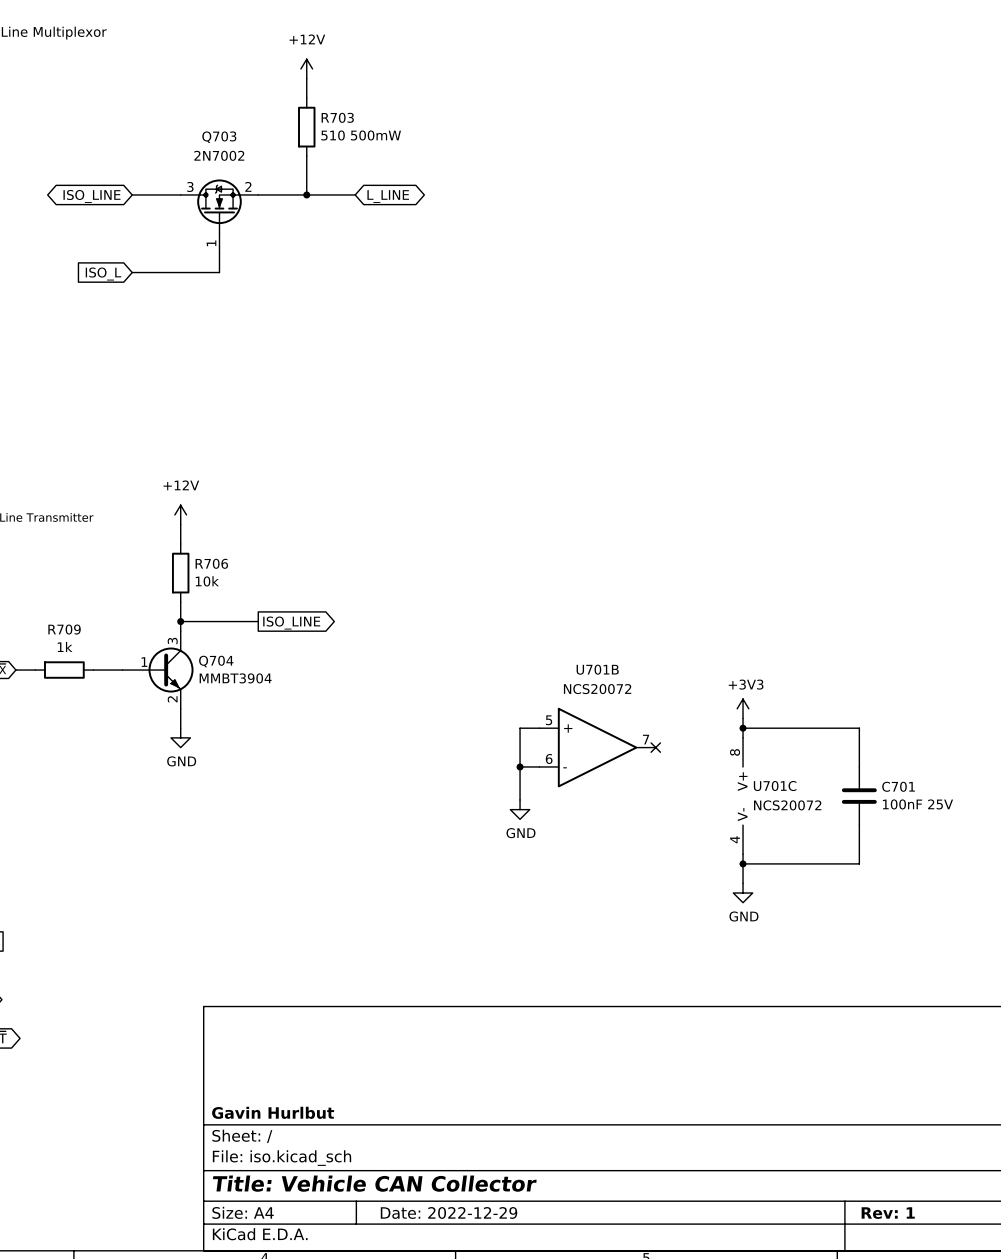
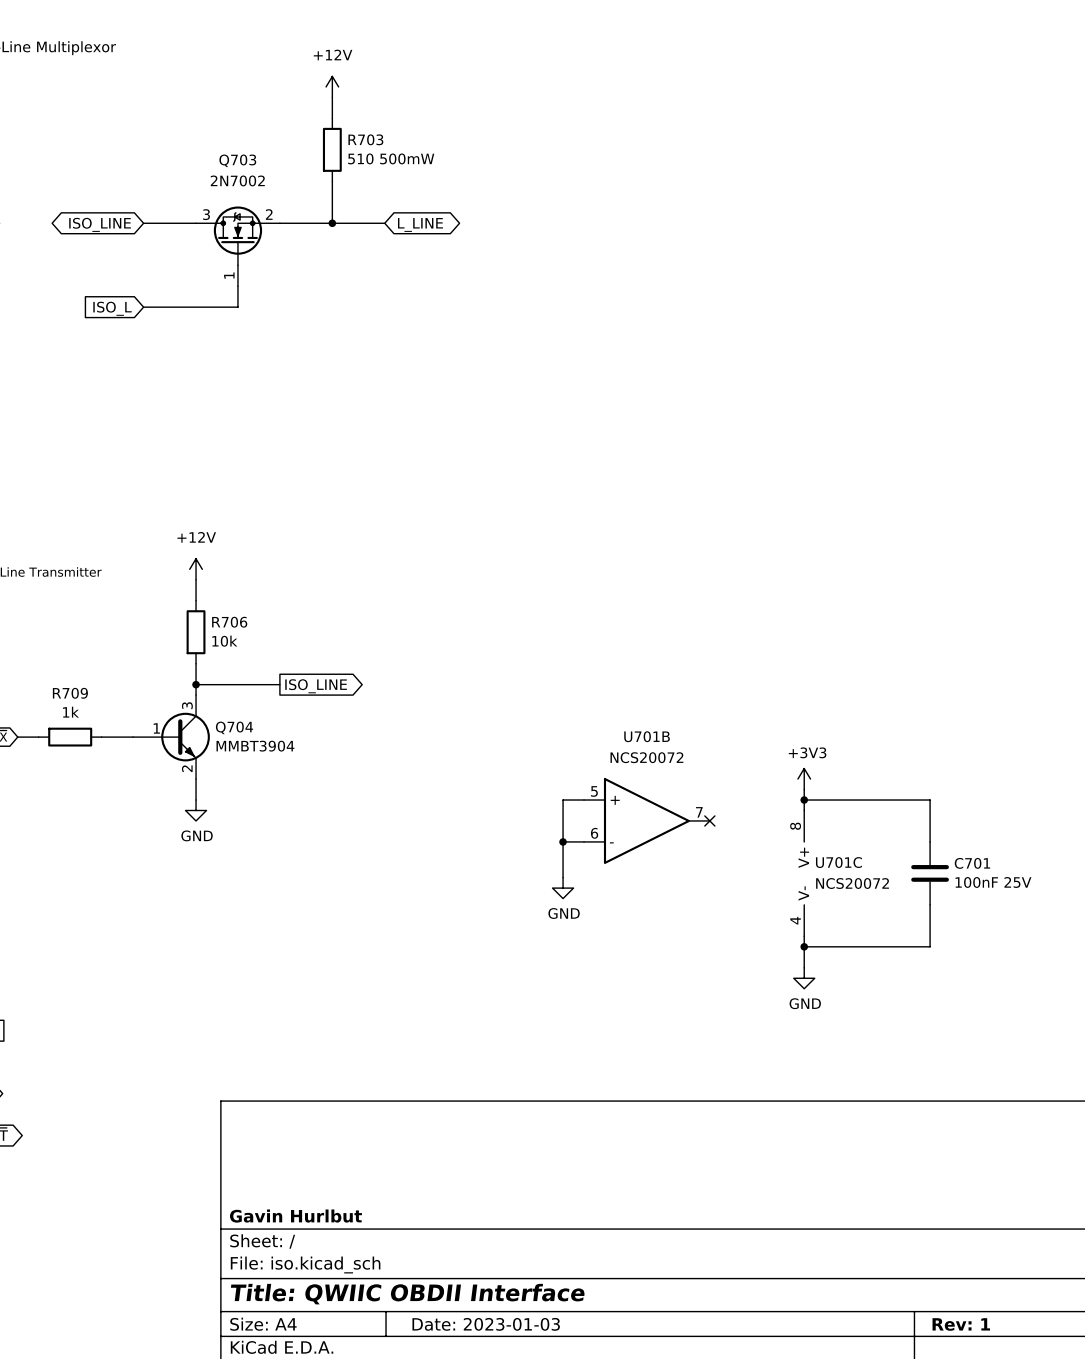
title block: Title: Vehicle CAN Collector (374, 1183) -> Title: QWIIC OBDII Interface (407, 1294)
title block: Date: 2022-12-29 (449, 1212) -> Date: 2023-01-03 (486, 1324)

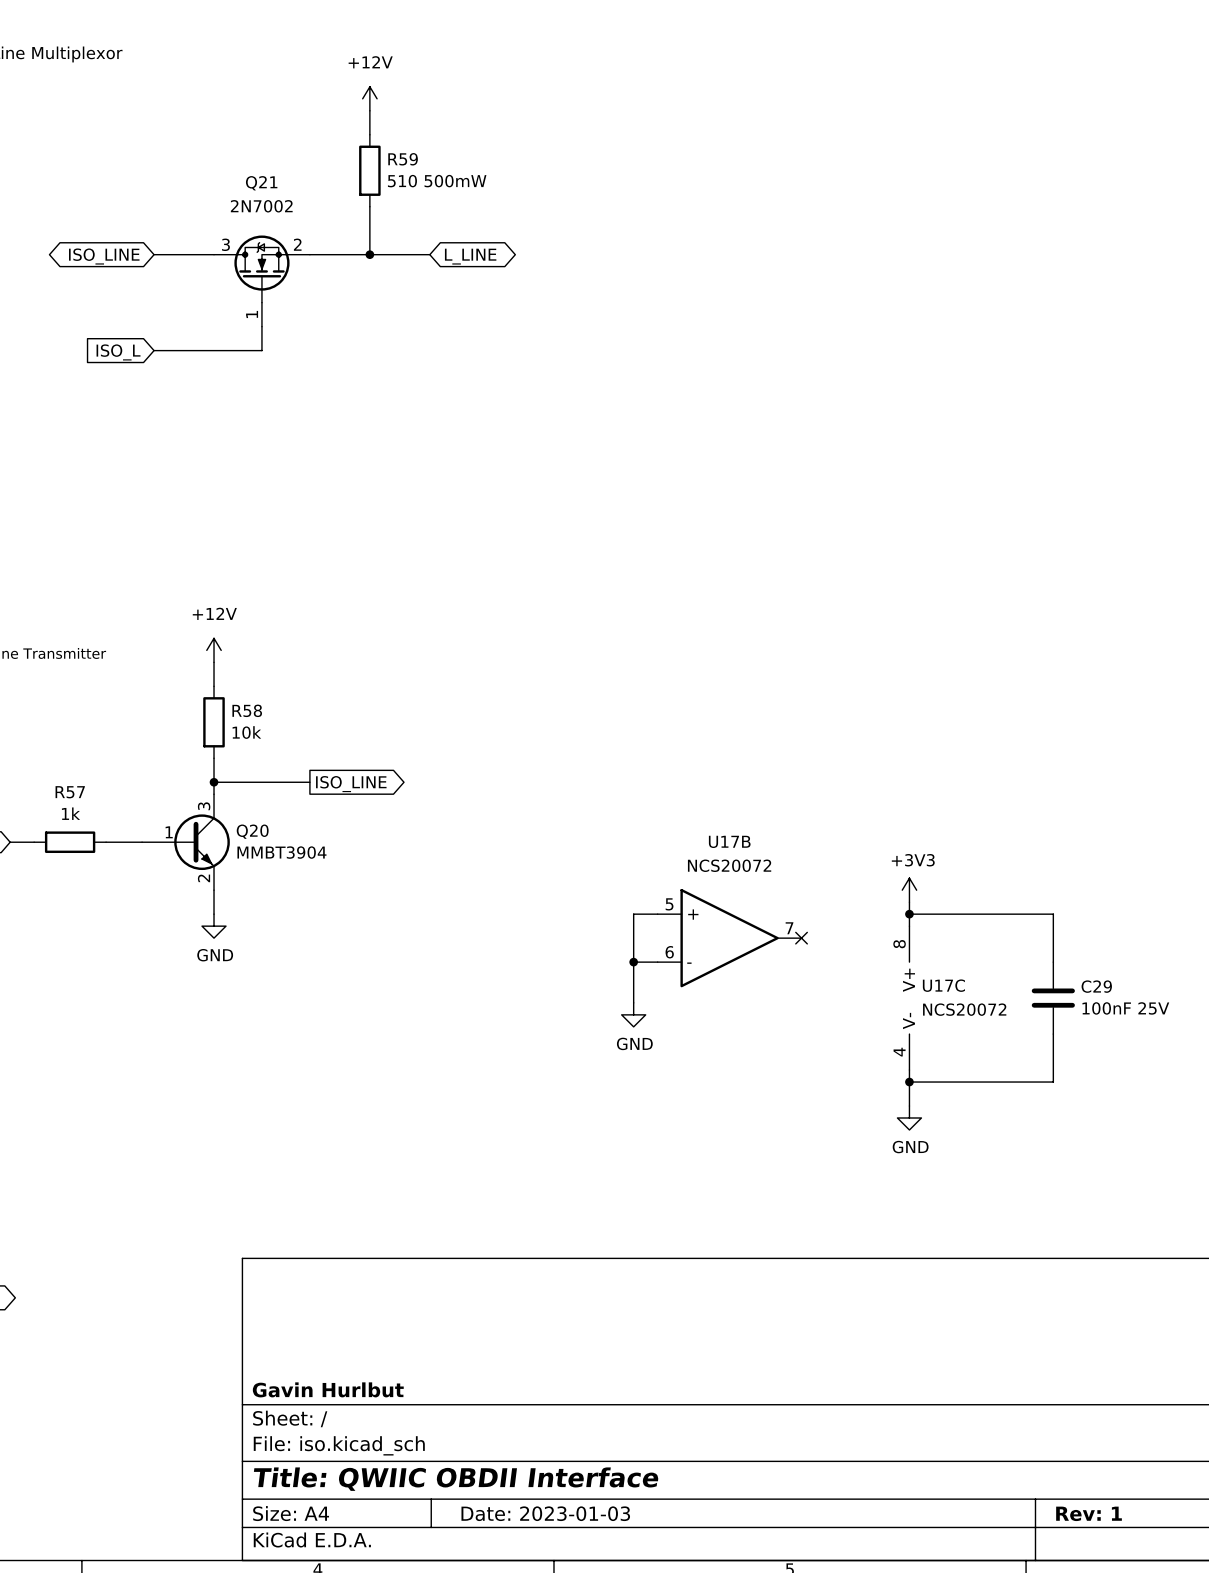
R703 name: R703 (365, 139) -> R59 (403, 159)
Q703 name: Q703 (237, 160) -> Q21 (261, 183)
R706 name: R706 (229, 622) -> R58 (247, 710)
R709 name: R709 (70, 693) -> R57 (70, 792)
Q704 name: Q704 (234, 727) -> Q20 (252, 831)
U701B name: U701B (647, 736) -> U17B (729, 841)
U701C name: U701C (838, 862) -> U17C (943, 985)
C701 name: C701 (972, 863) -> C29 (1096, 986)

